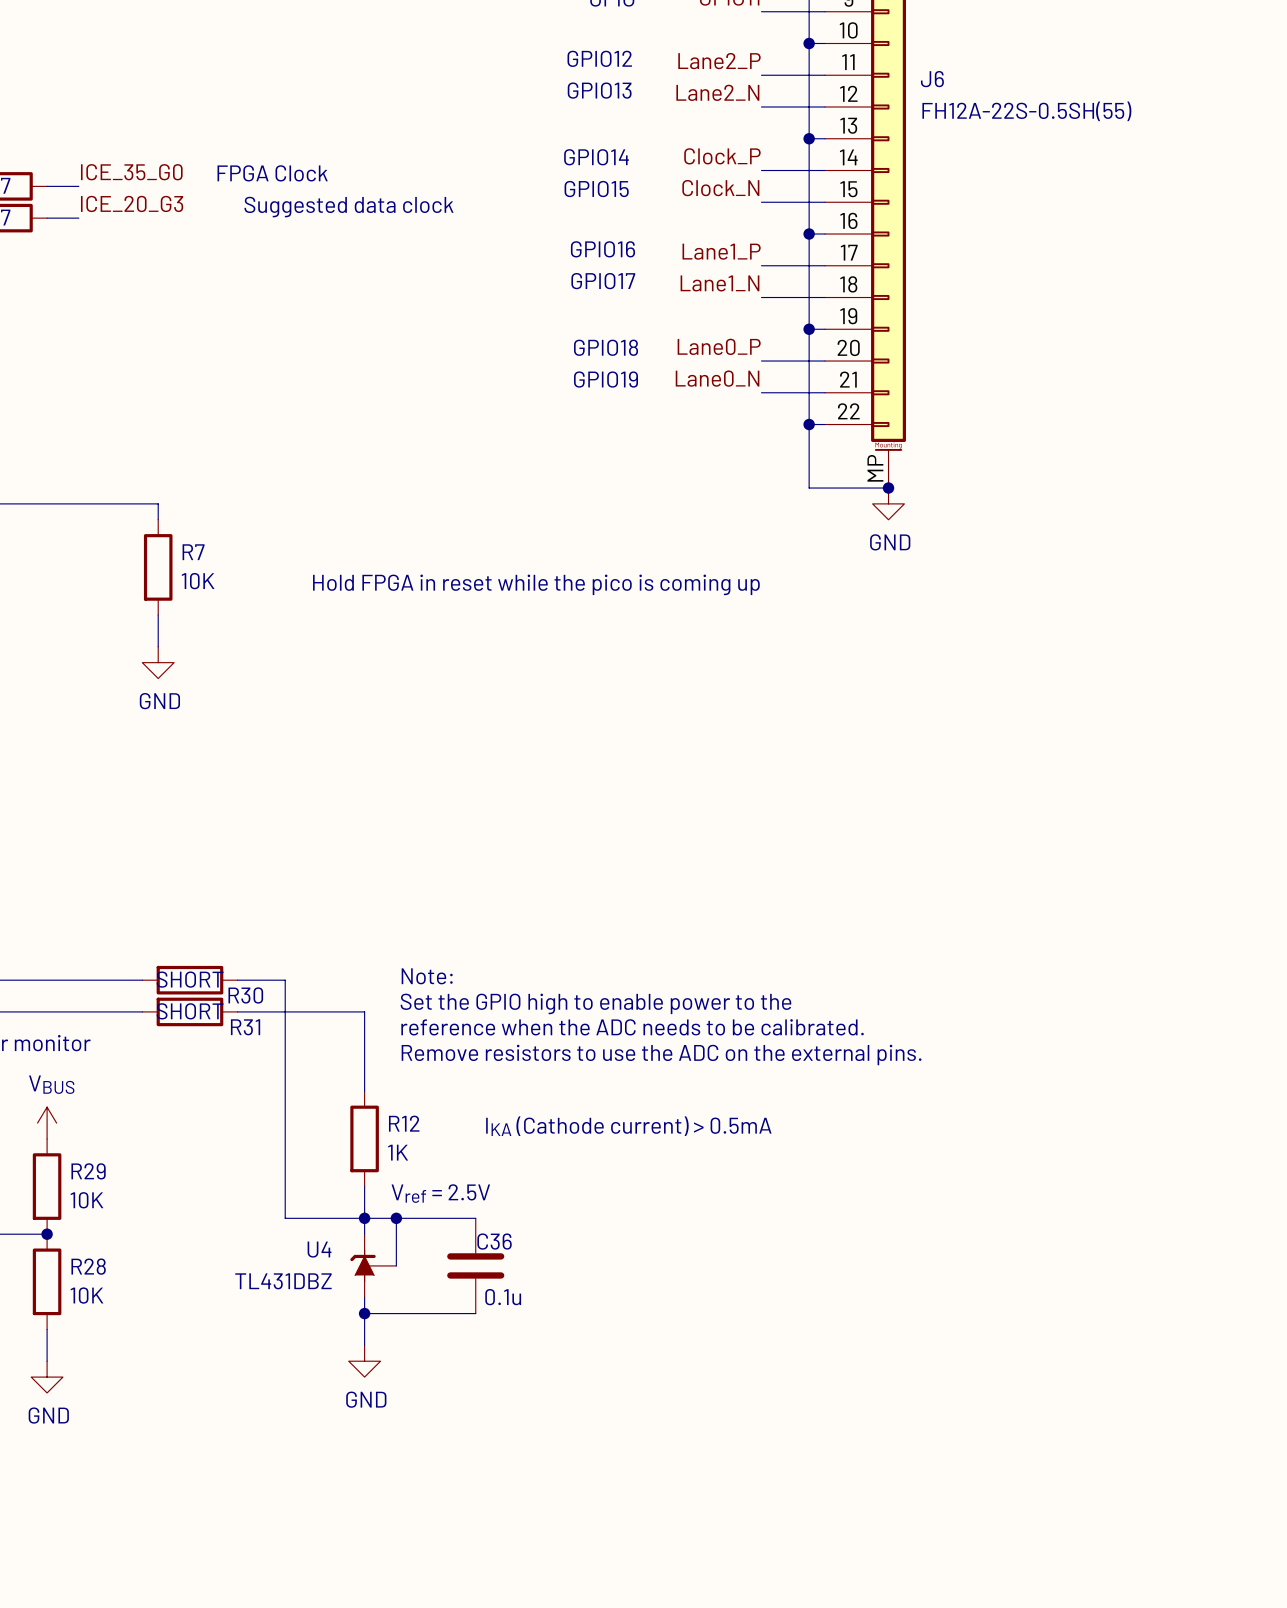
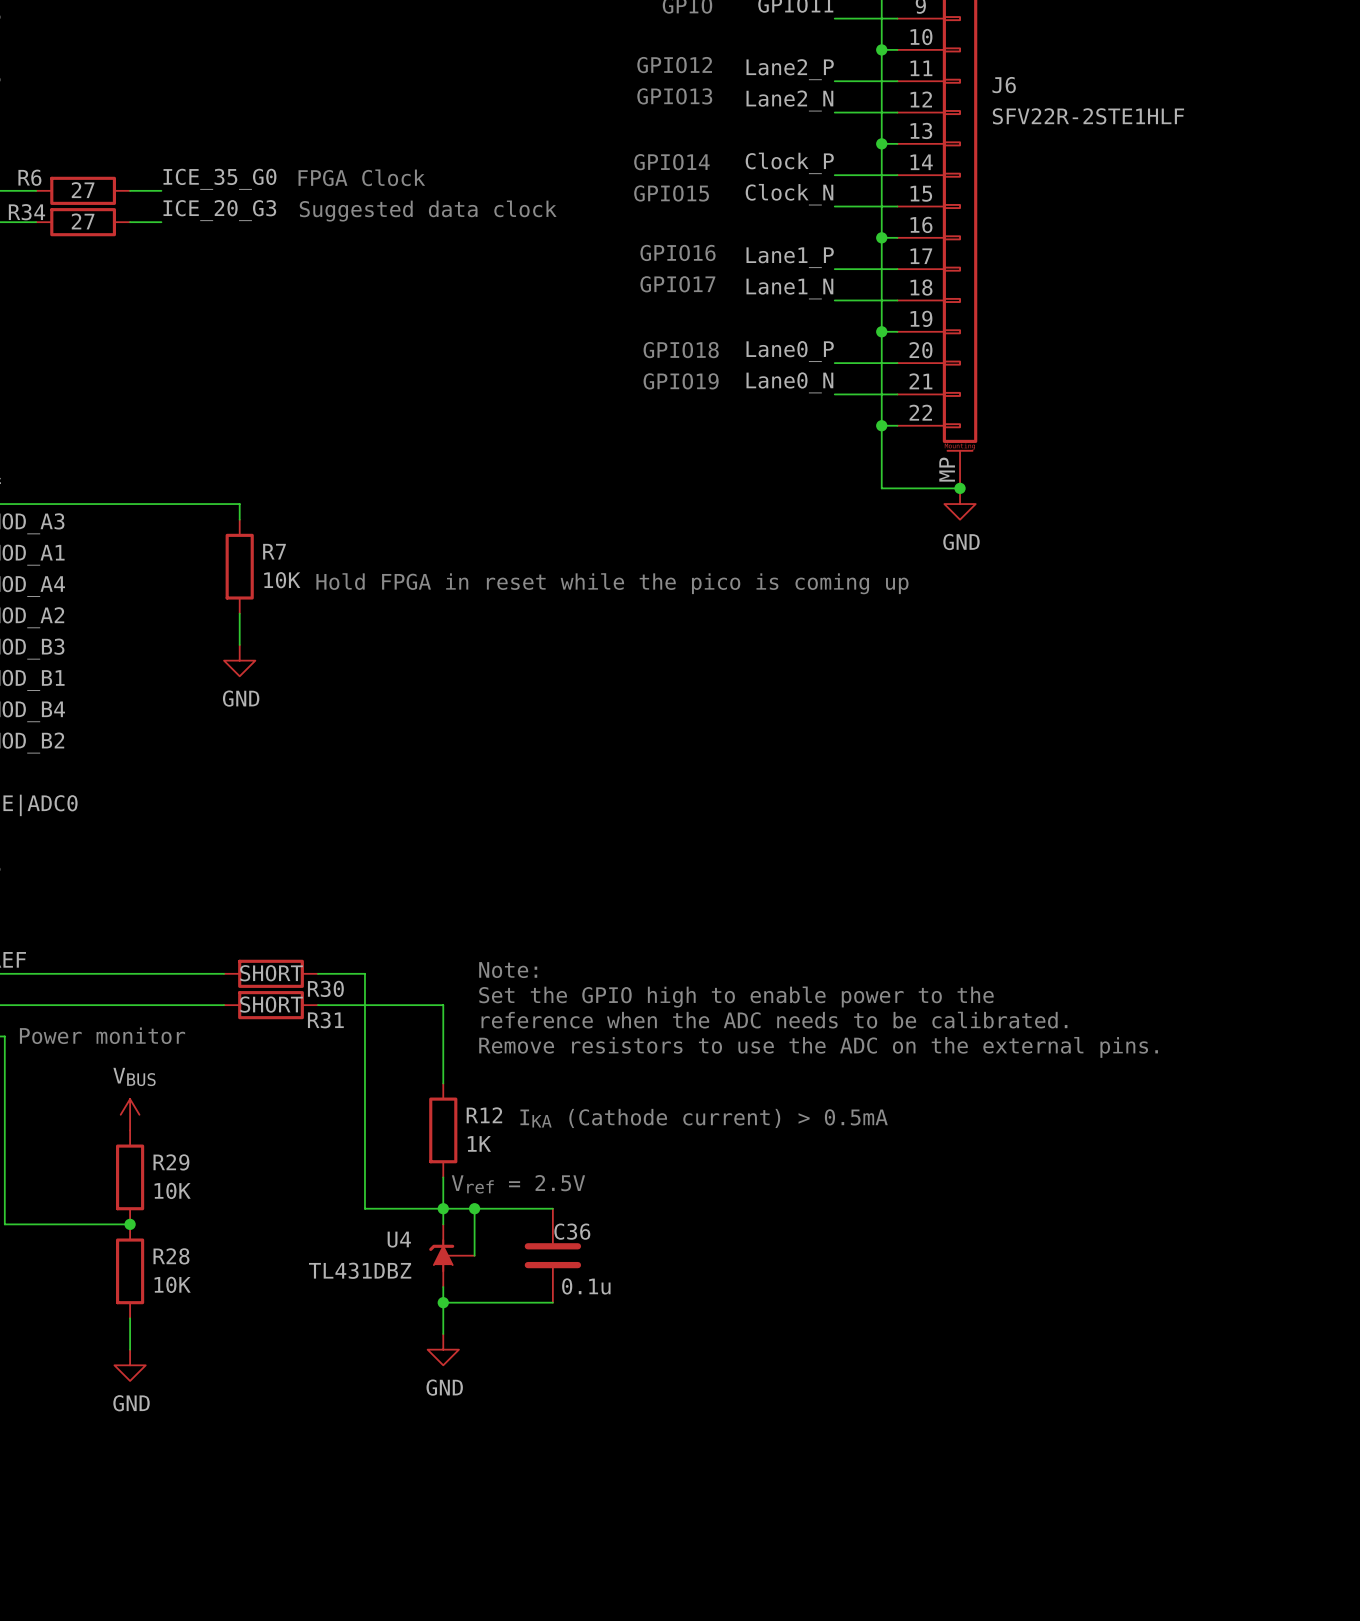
J6 value: FH12A-22S-0.5SH(55) (1026, 111) -> SFV22R-2STE1HLF (1088, 116)

